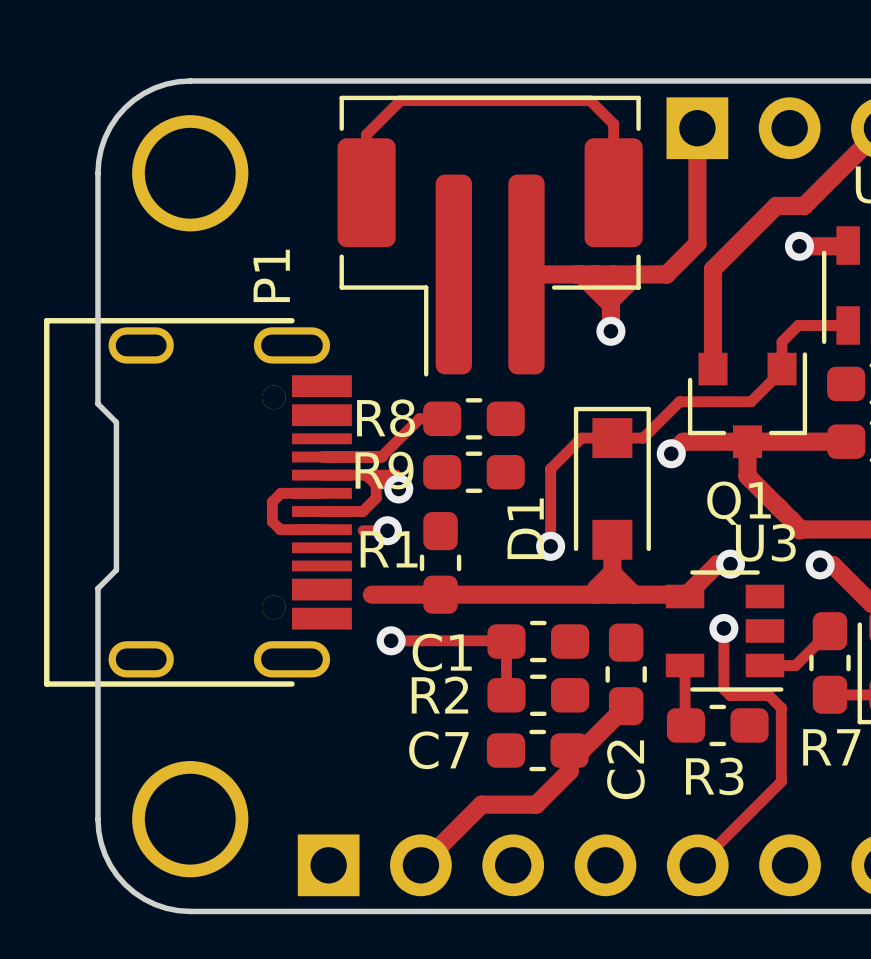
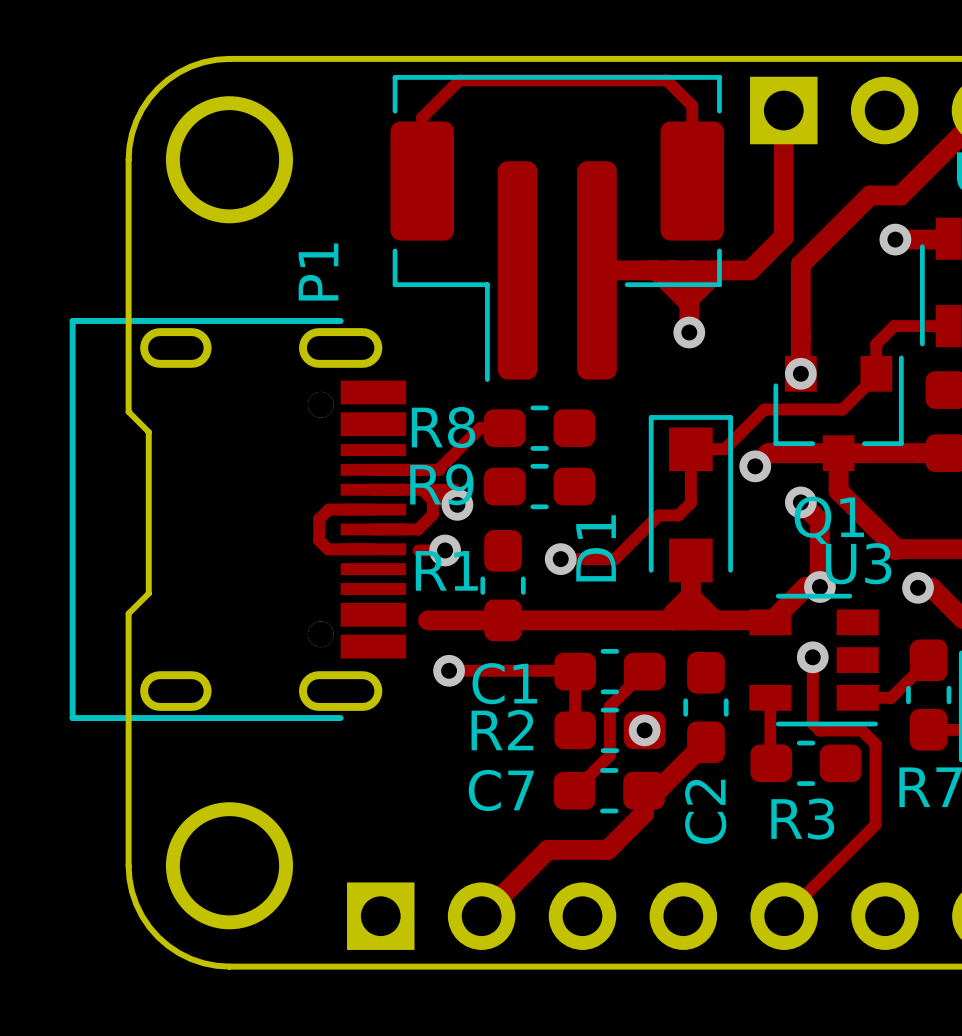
via: none -> (800, 373)
track: (612, 438) (581, 438) (550, 468) (550, 546) -> (690, 449) (690, 502) (678, 515) (658, 515) (614, 559) (560, 559)
track: none -> (800, 502) (819, 521) (819, 586)
via: none -> (800, 502)
via position: (550, 546) -> (560, 559)
track: none -> (644, 671) (609, 706) (609, 755) (574, 790)
via: none -> (644, 730)

